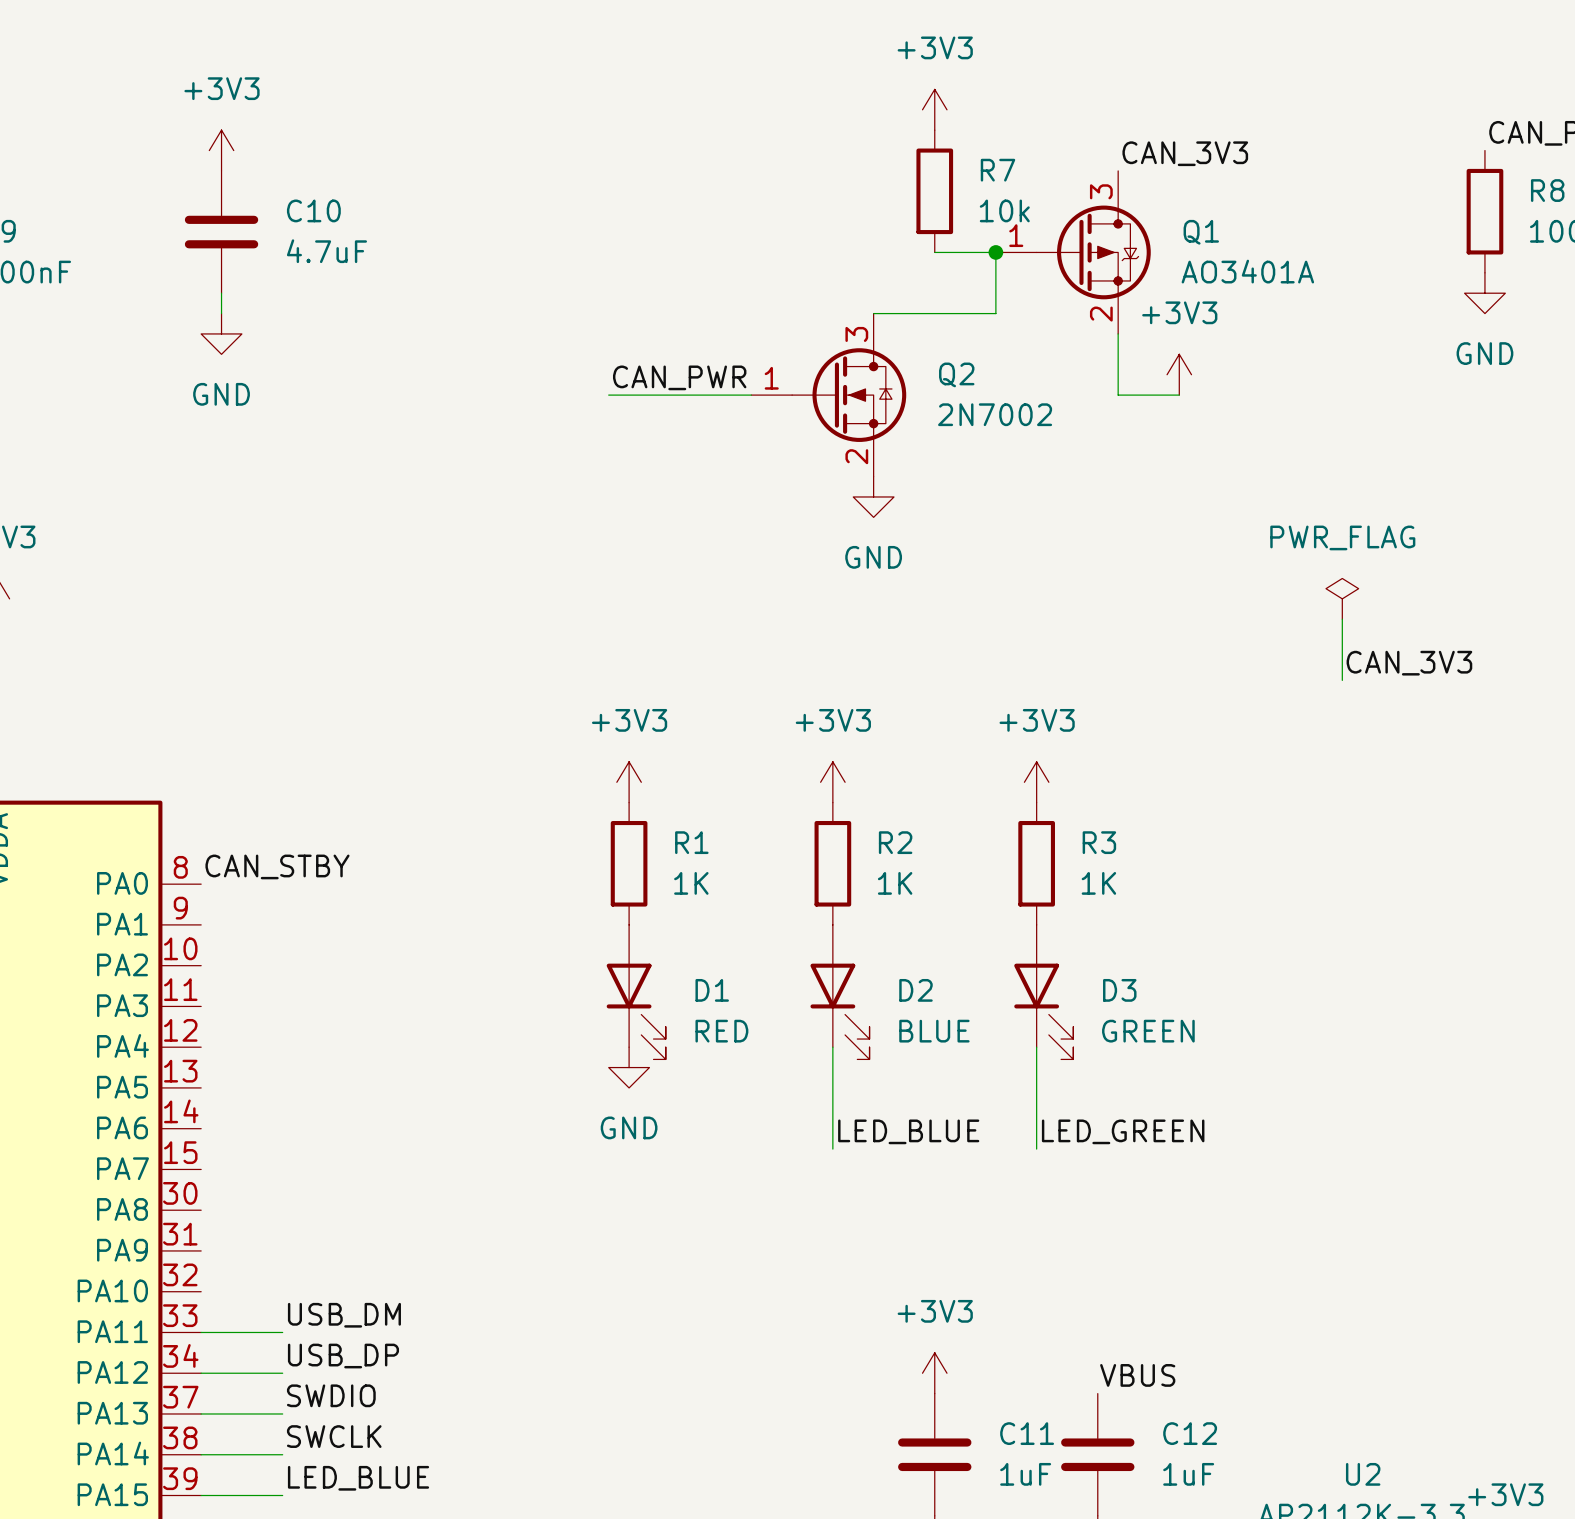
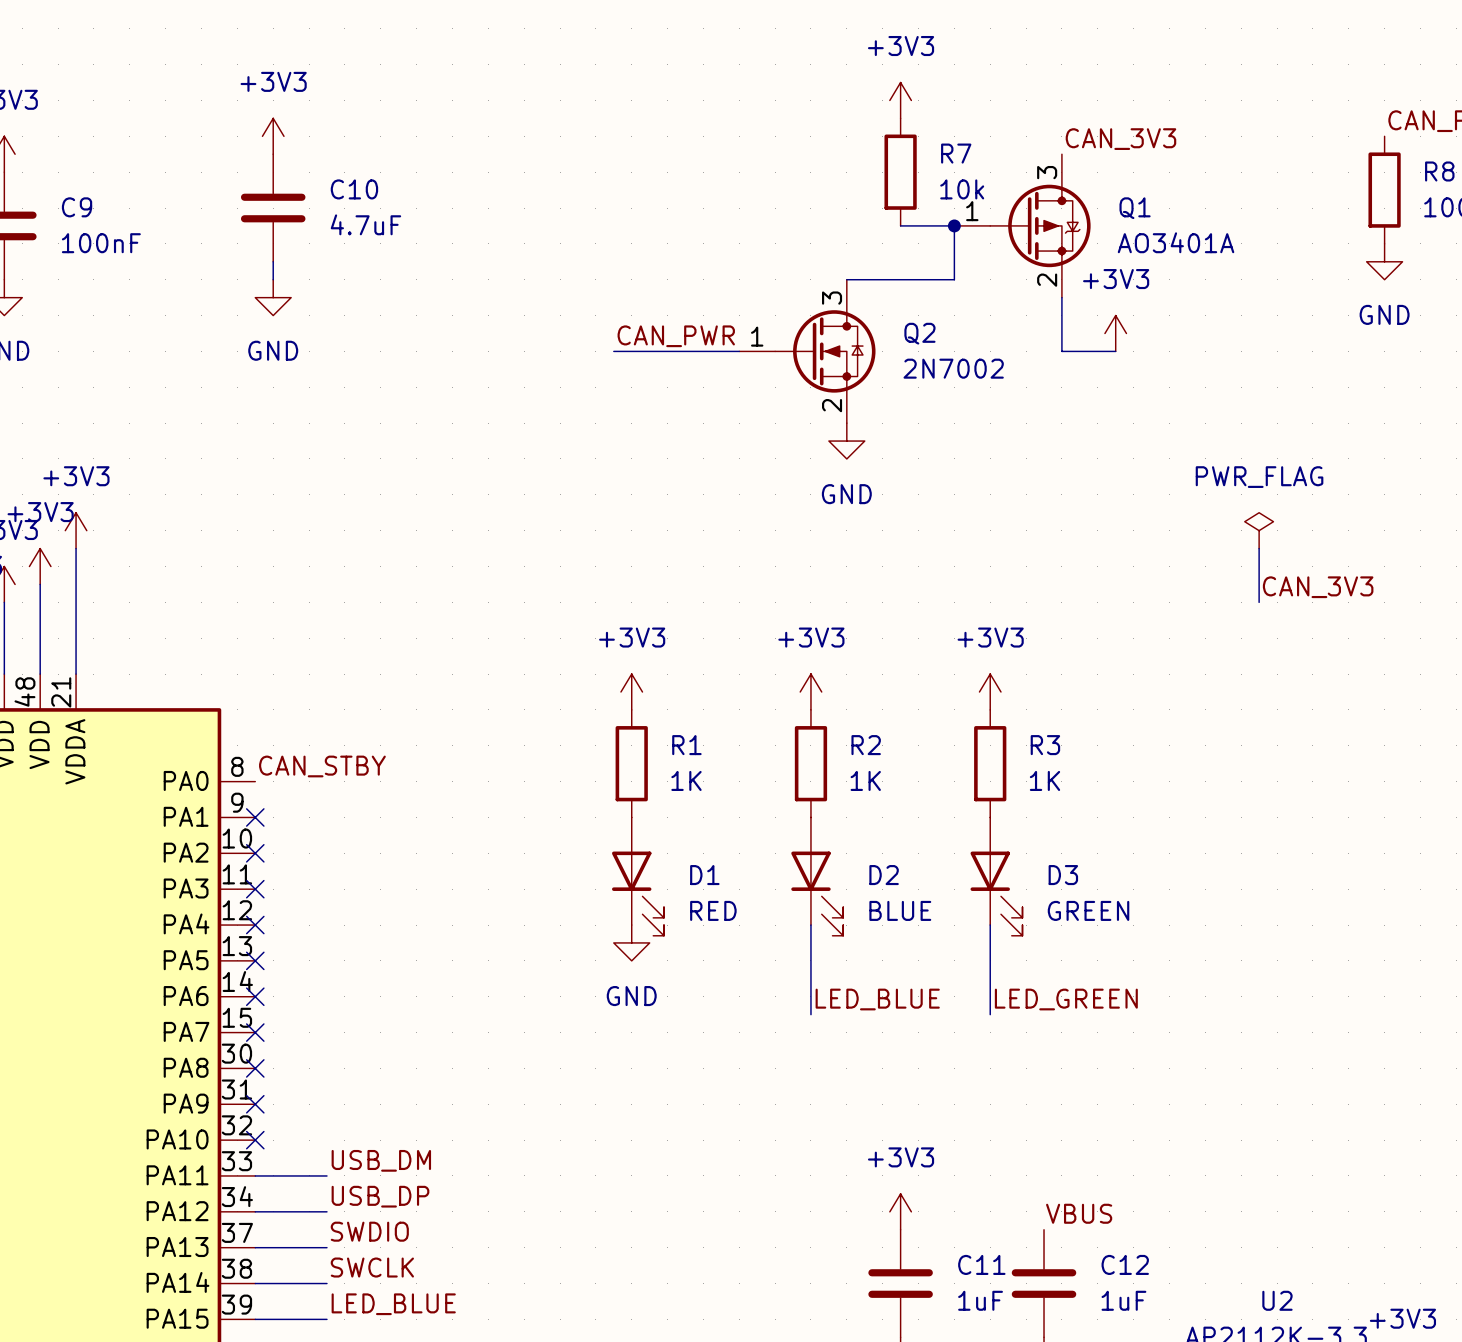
no-connect mark: none -> (255, 817)
no-connect mark: none -> (255, 853)
no-connect mark: none -> (255, 889)
no-connect mark: none -> (255, 925)
no-connect mark: none -> (255, 960)
no-connect mark: none -> (255, 996)
no-connect mark: none -> (255, 1032)
no-connect mark: none -> (255, 1068)
no-connect mark: none -> (255, 1104)
no-connect mark: none -> (255, 1140)

